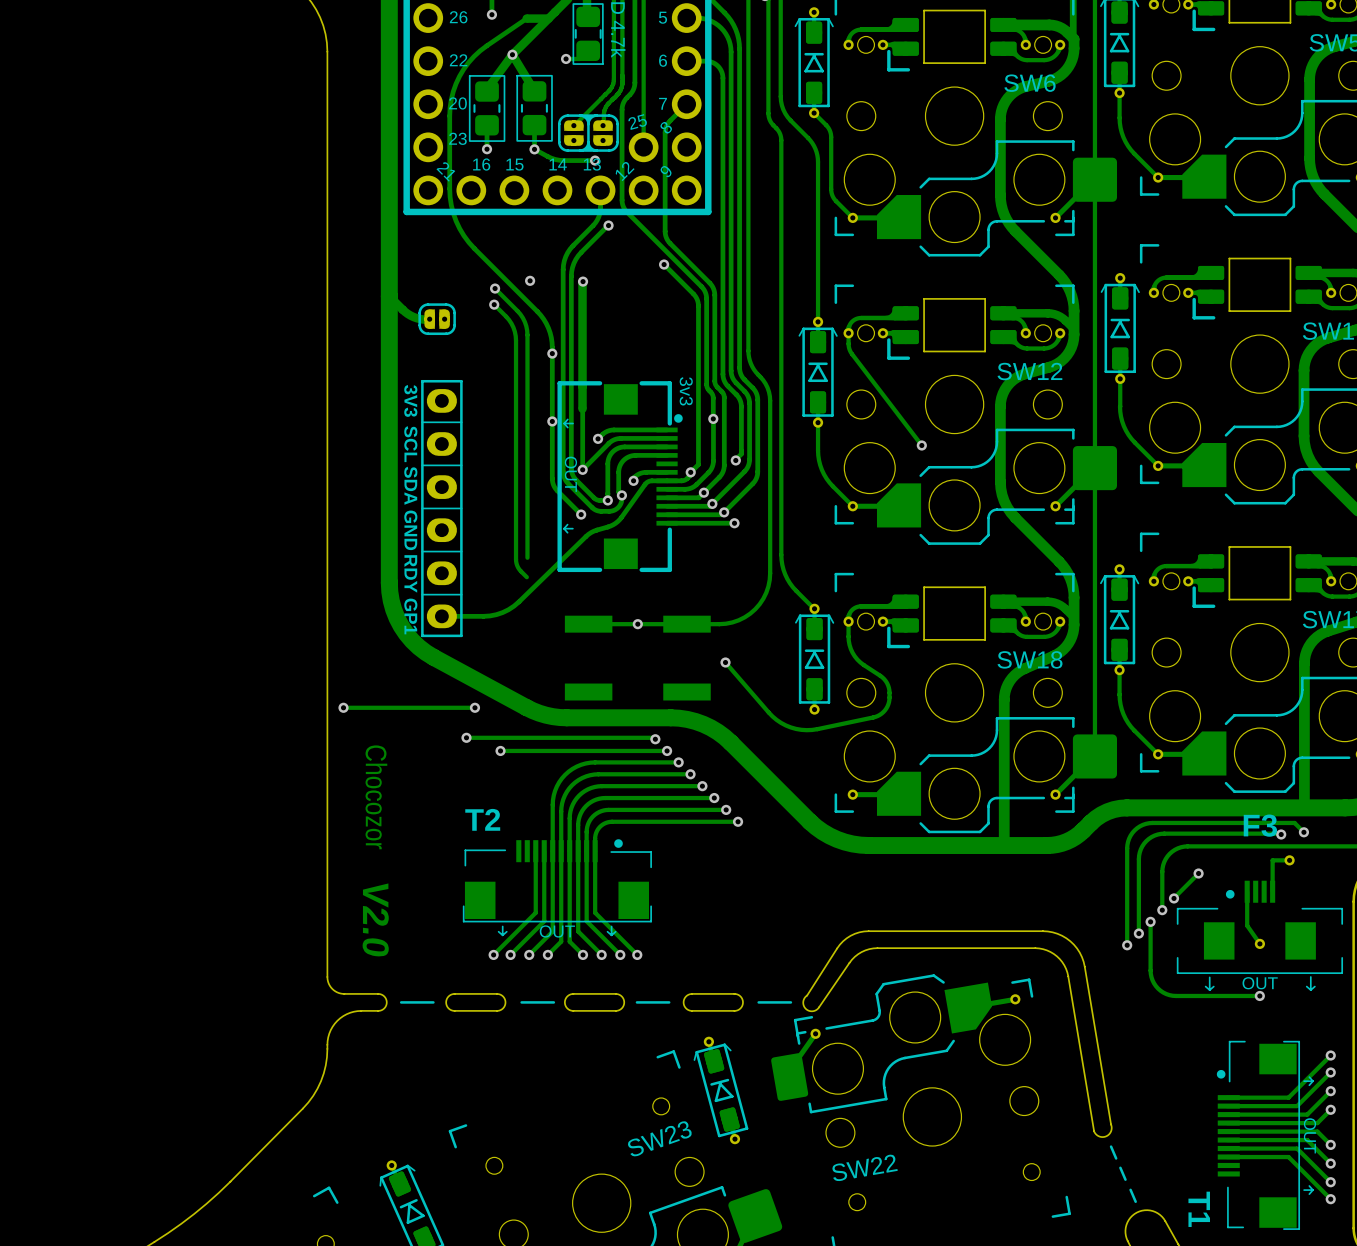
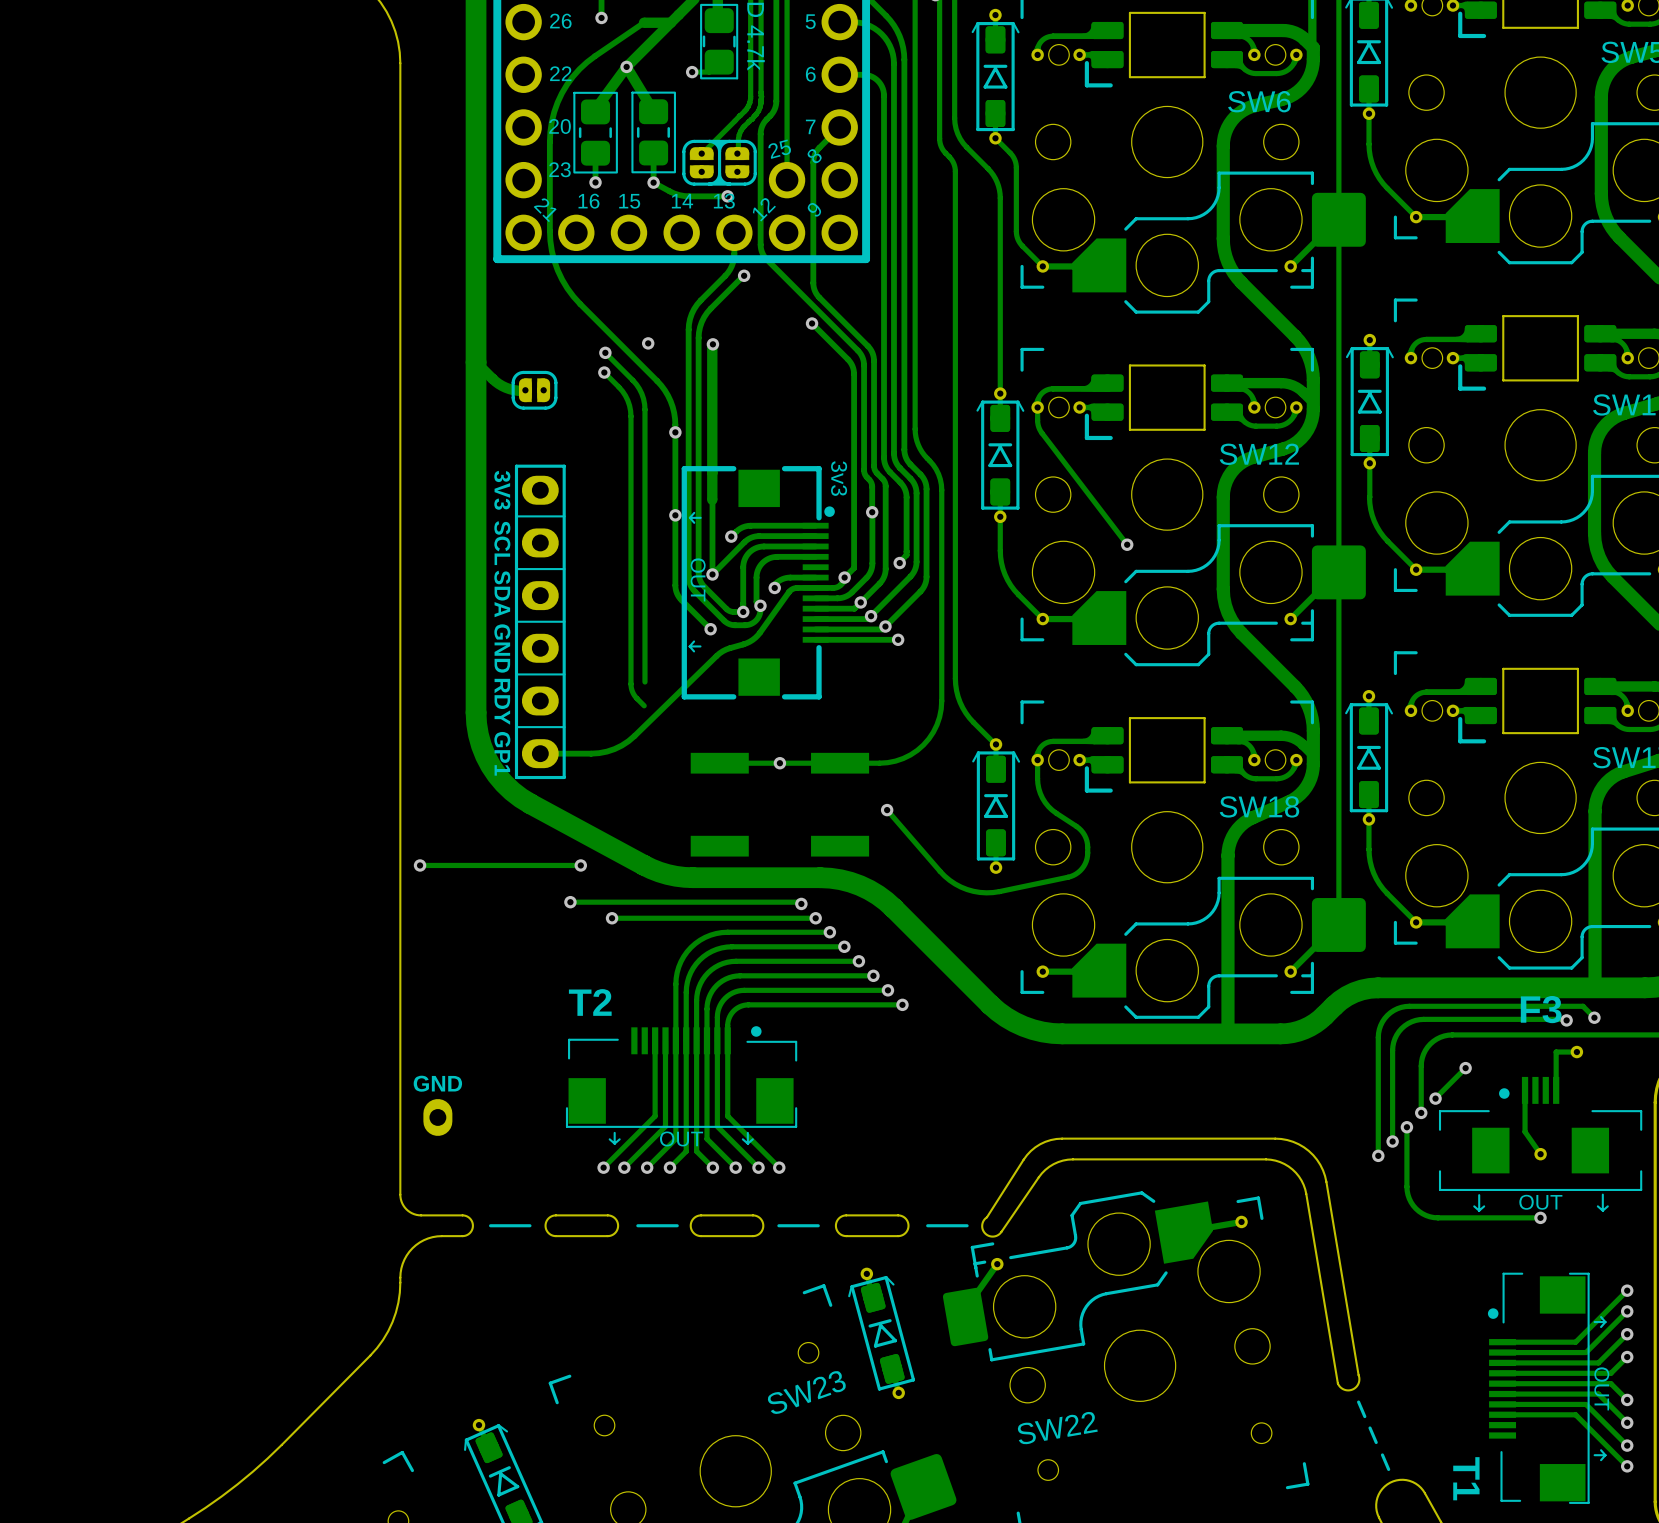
text: Chocozor (376, 797) -> none
part: none -> (437, 1117)
text: V2.0 (375, 920) -> none

